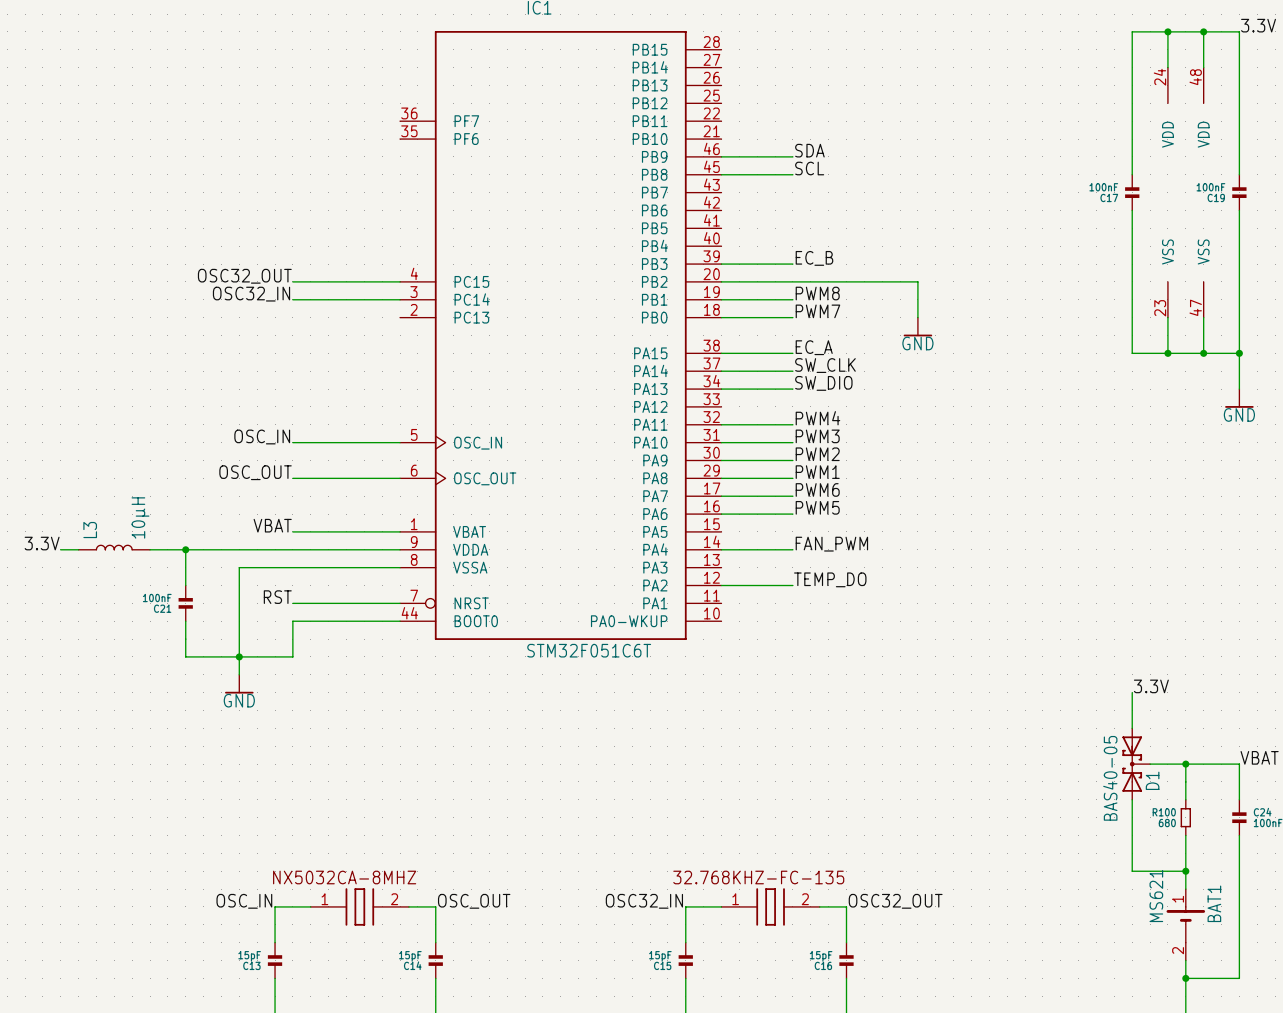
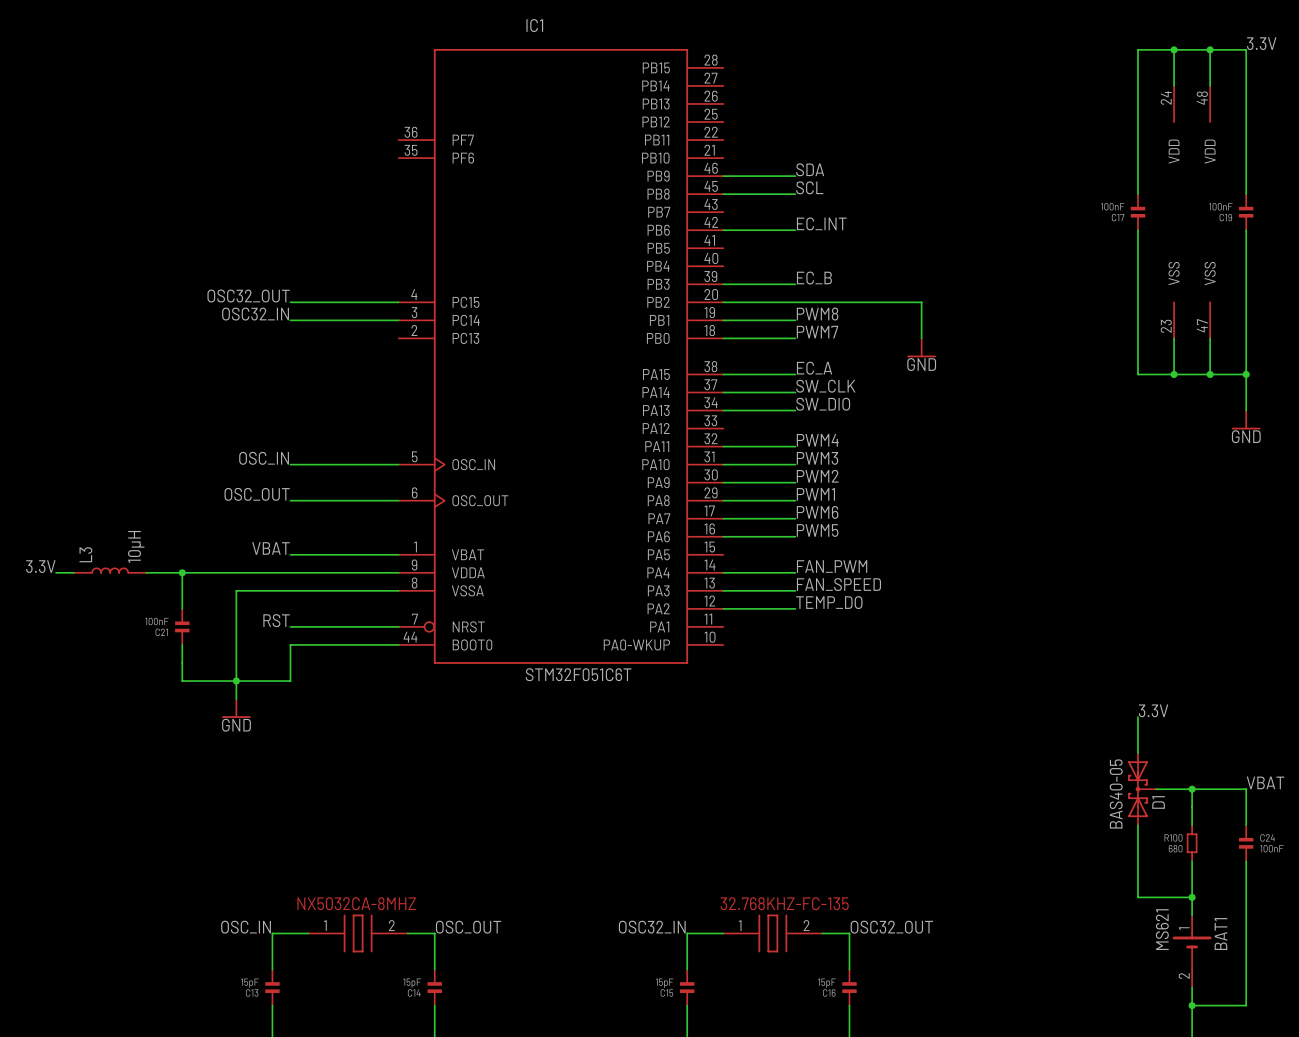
label: none -> EC_INT (821, 223)
wire: none -> (723, 230) (795, 230)
label: none -> FAN_SPEED (838, 584)
wire: none -> (723, 590) (795, 590)

